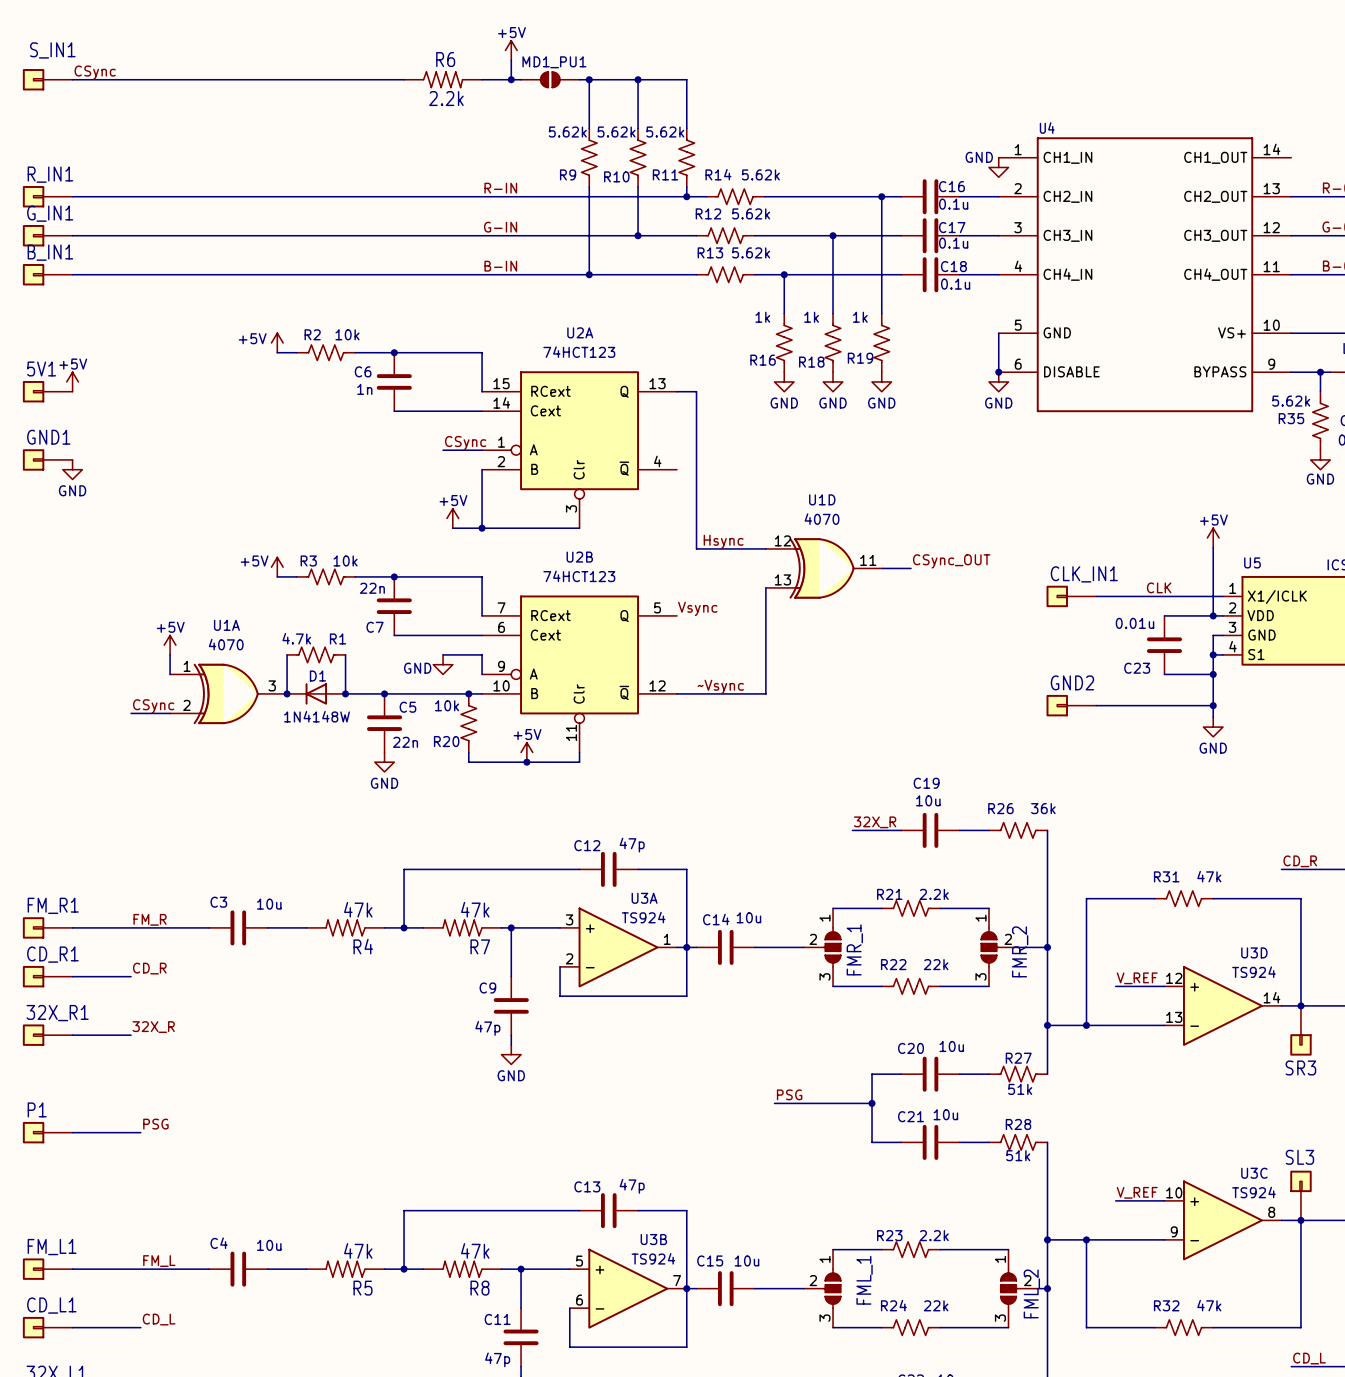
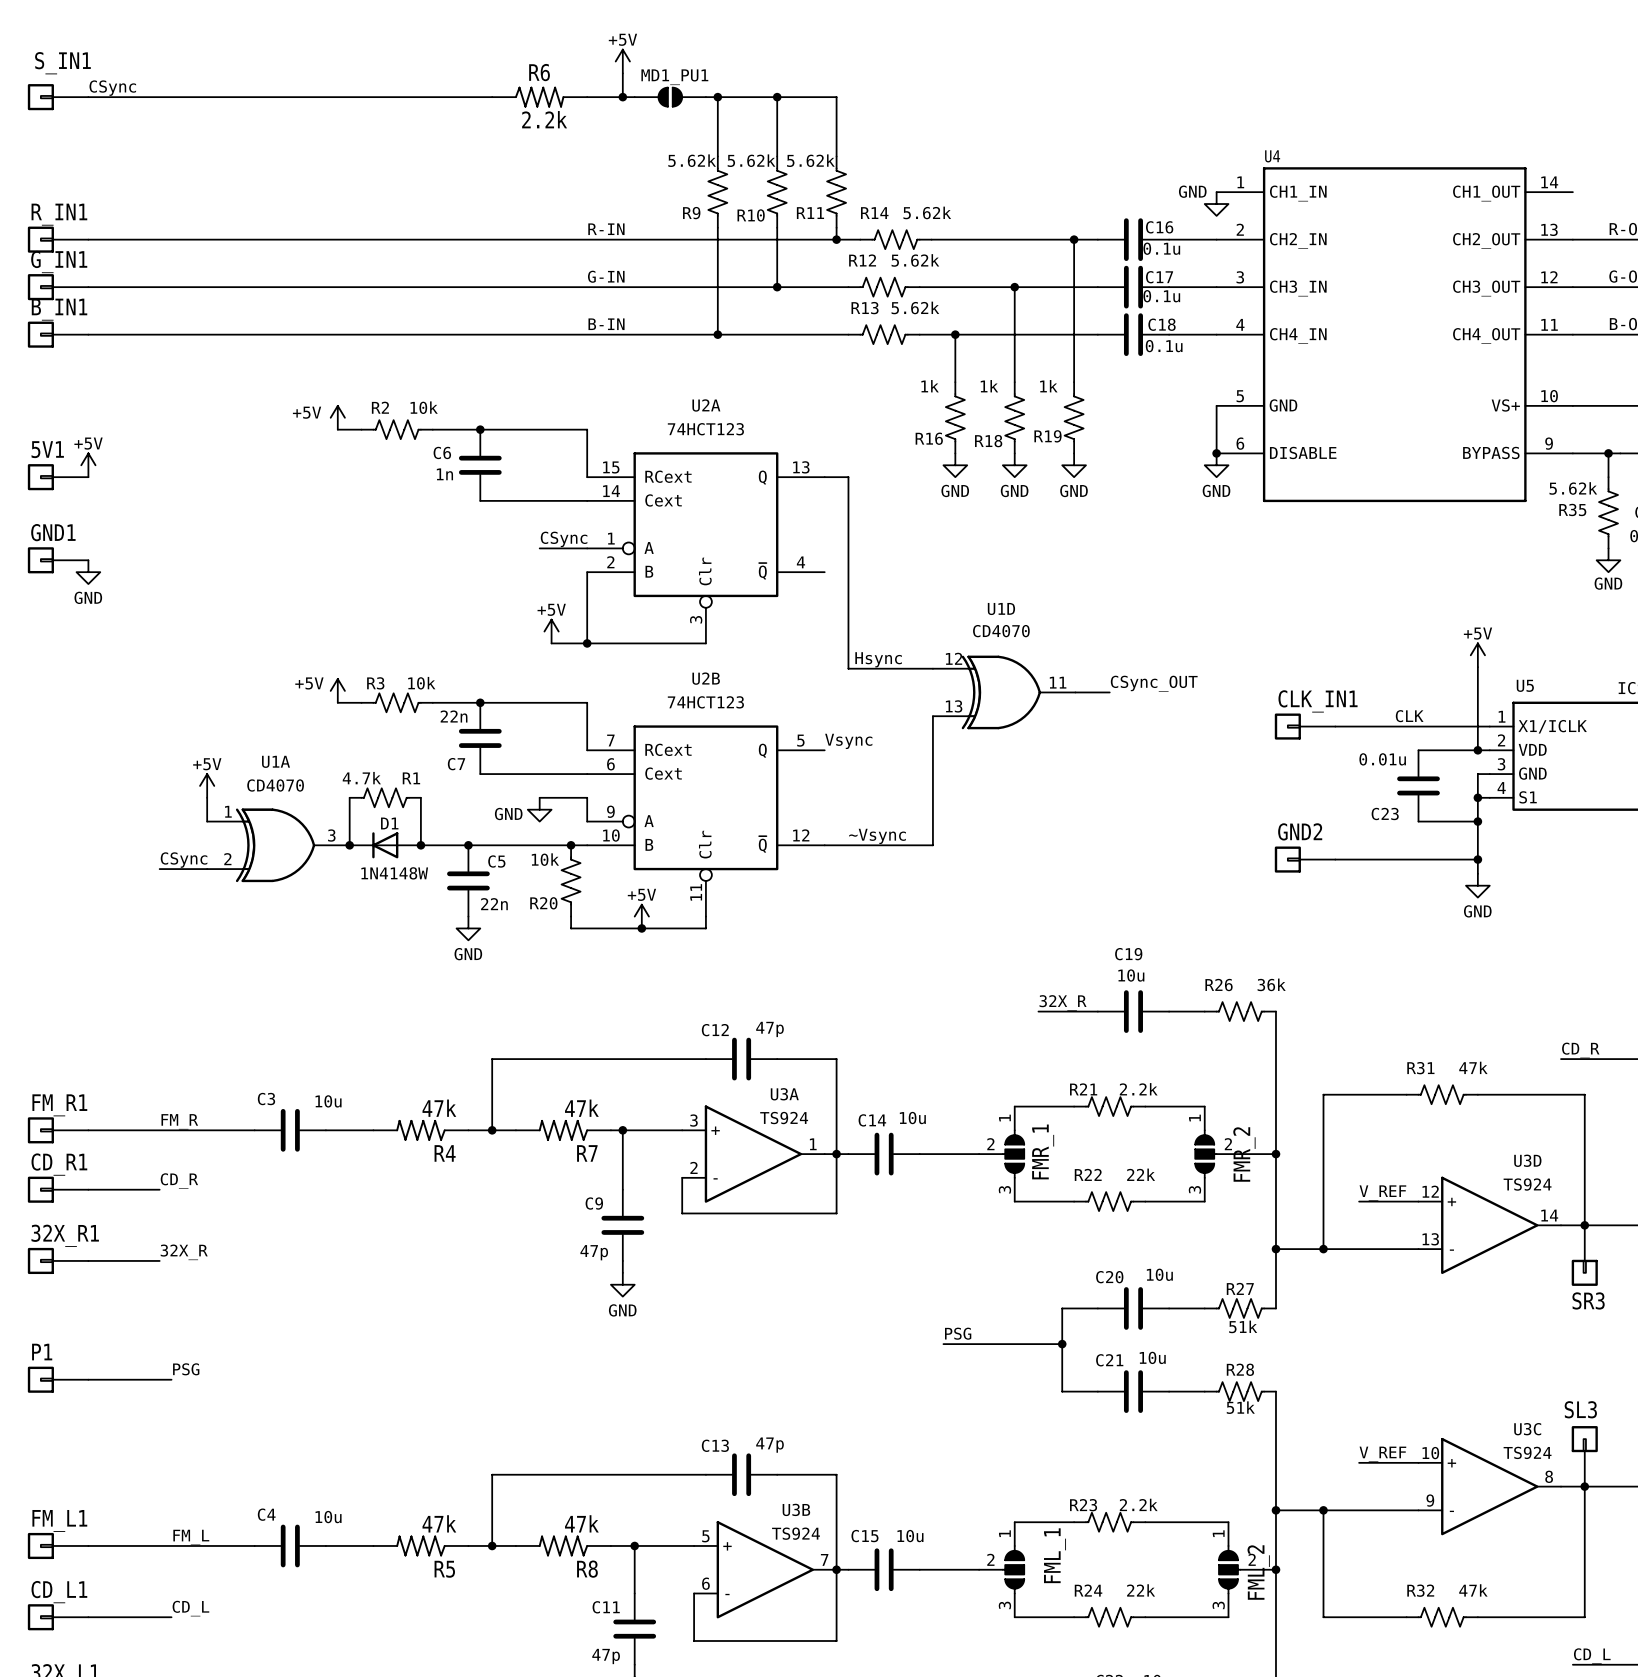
U1D value: 4070 (822, 519) -> CD4070 (1001, 631)
U1A value: 4070 (226, 644) -> CD4070 (275, 785)

